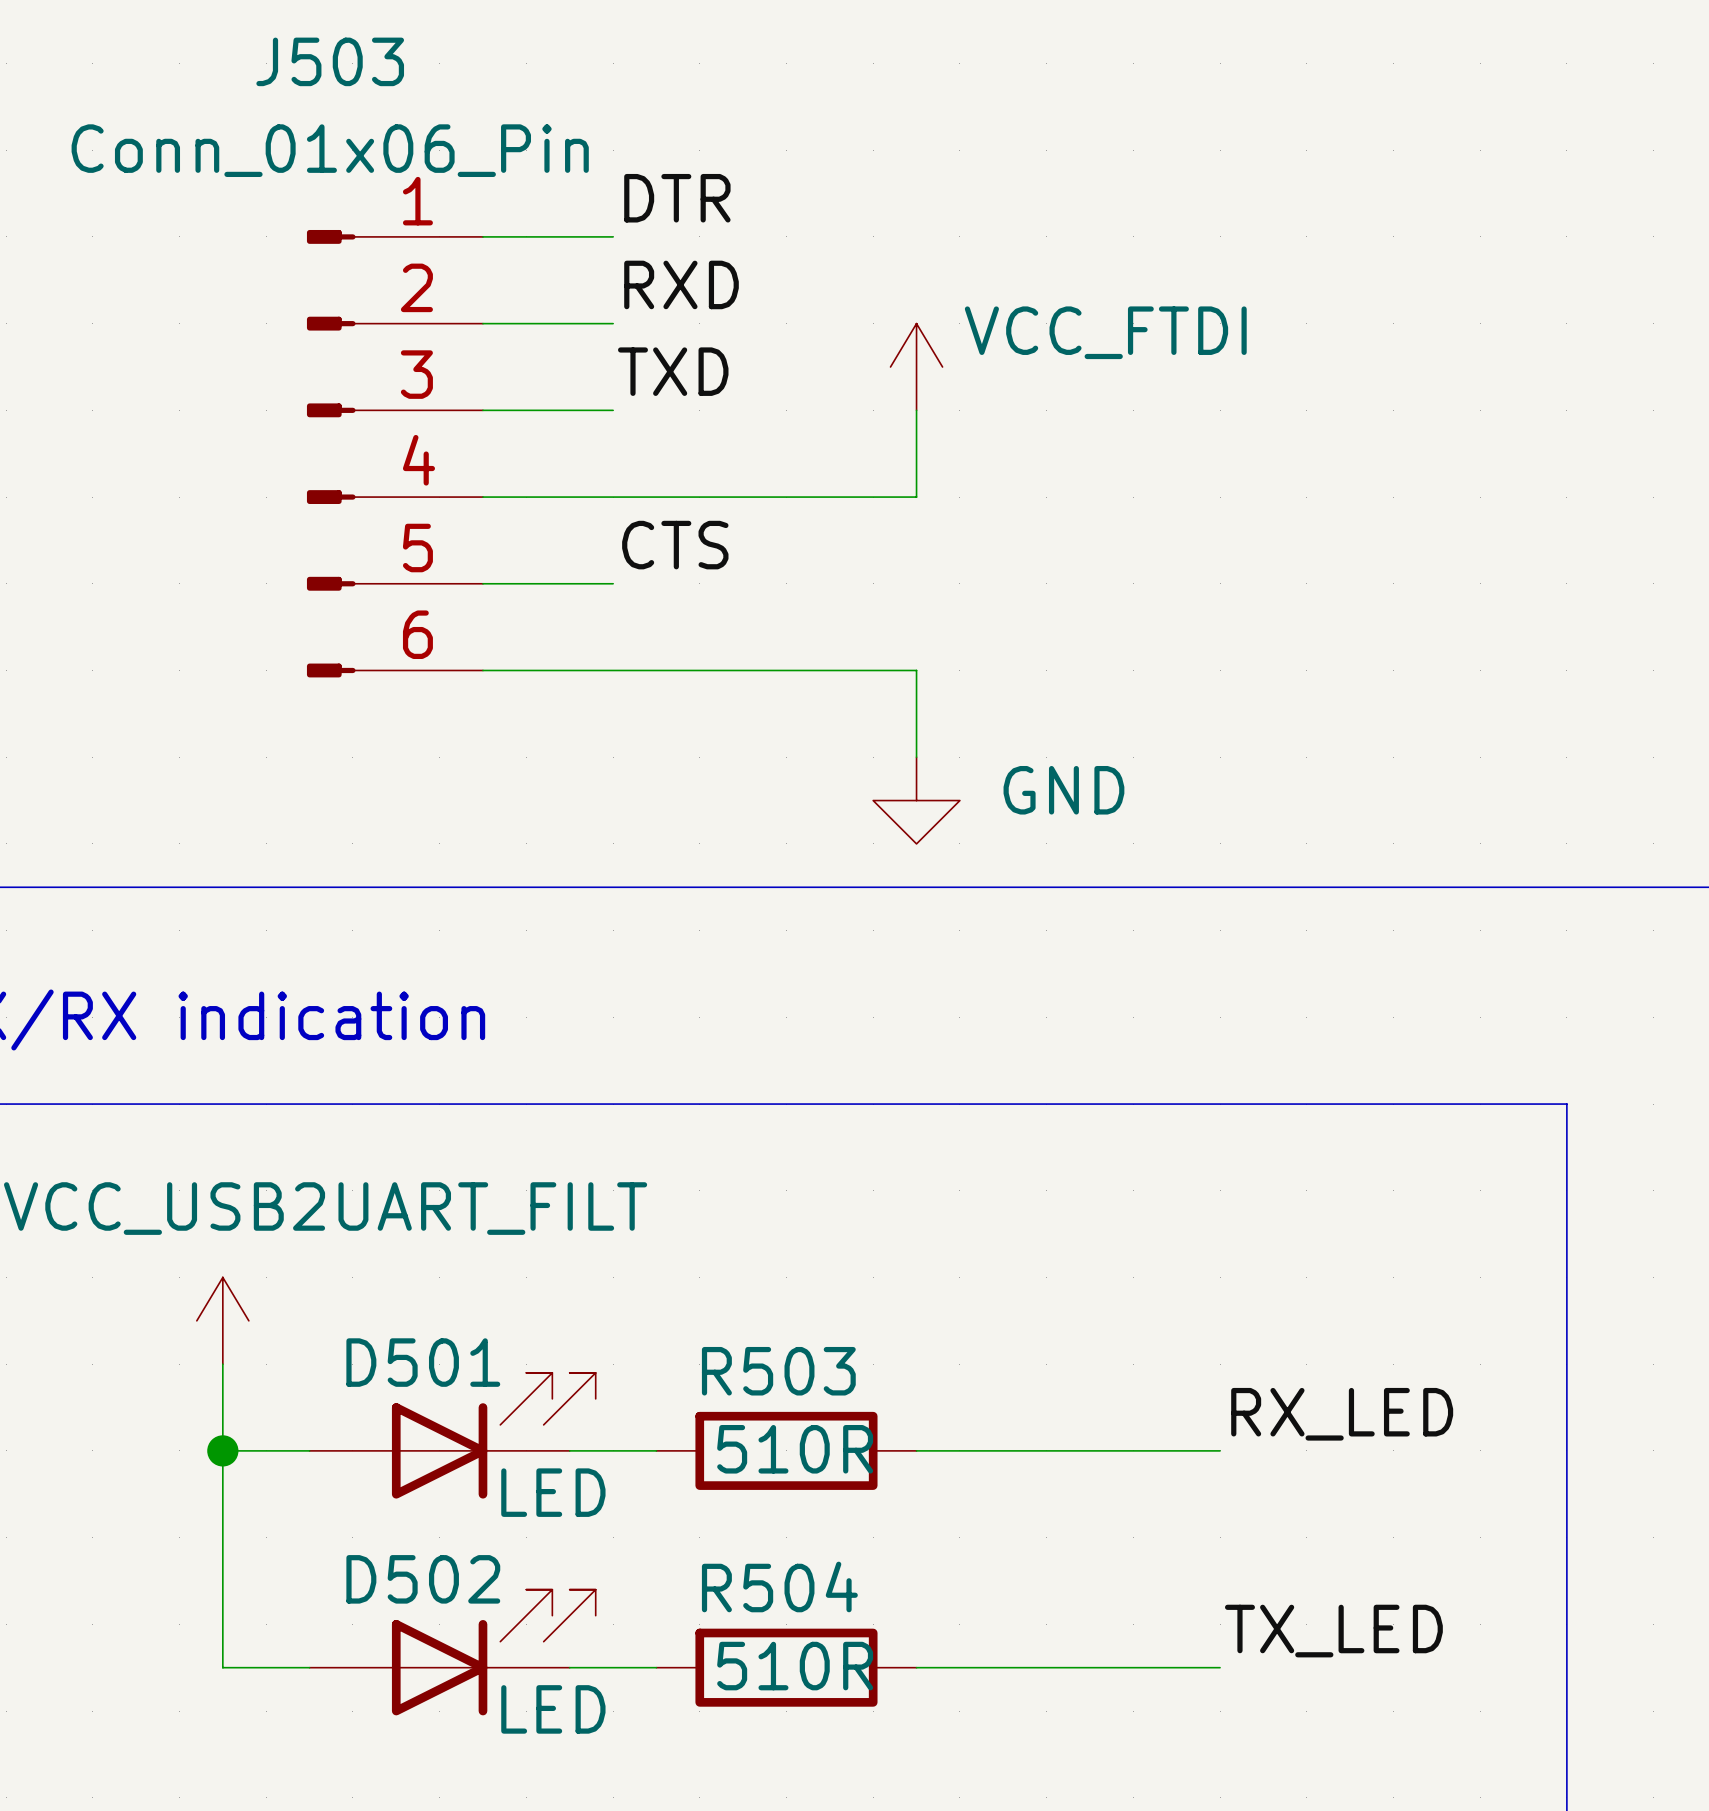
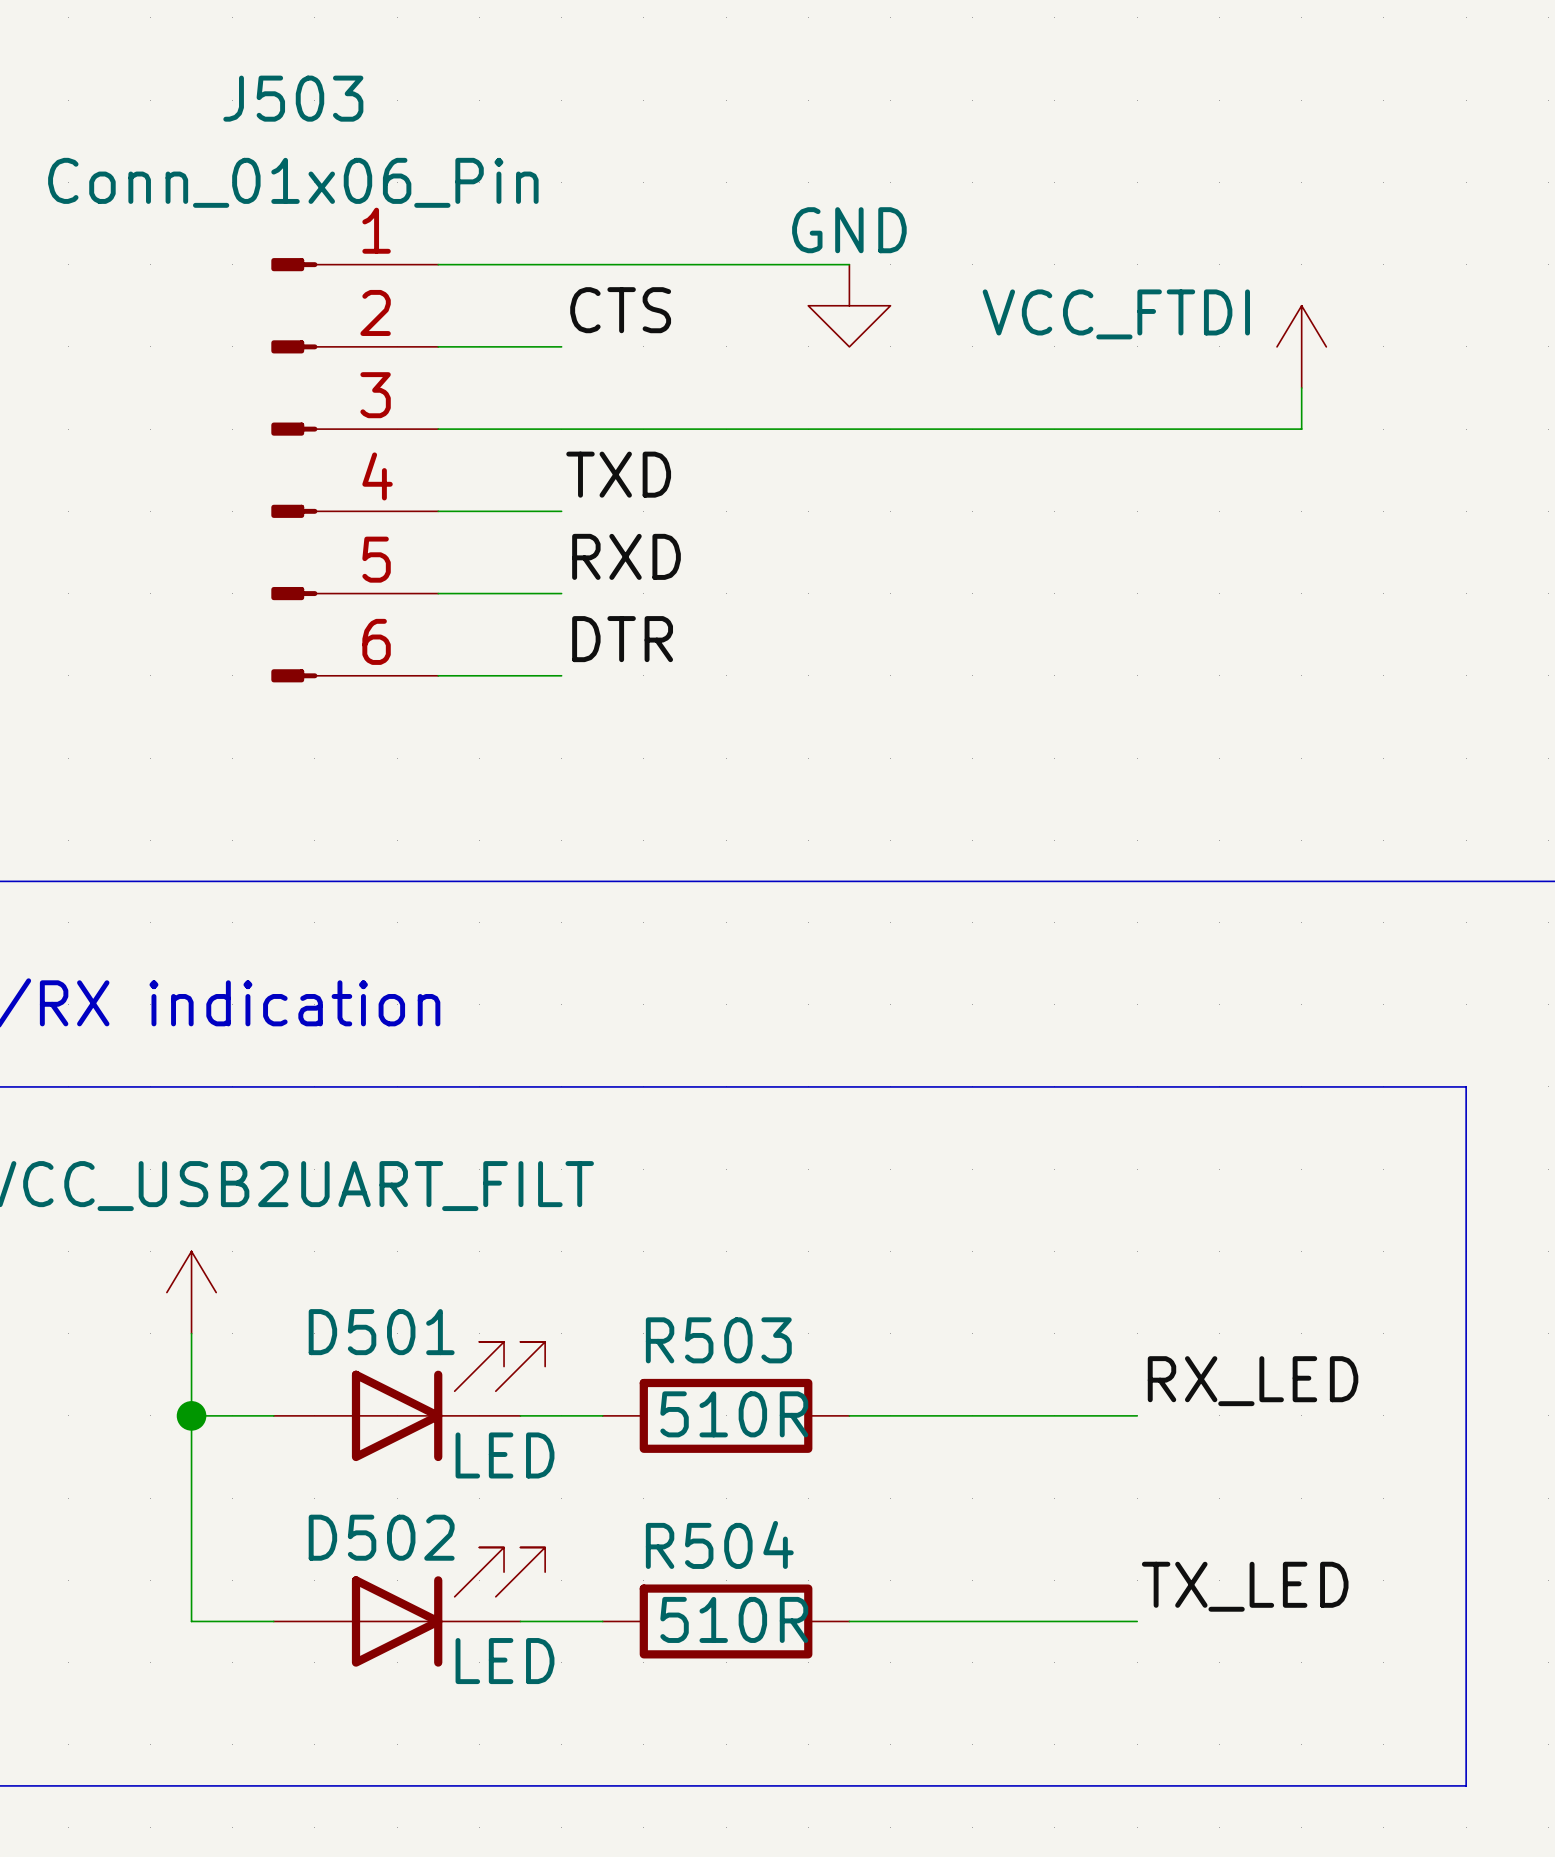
label position: DTR (677, 198) -> DTR (622, 639)
wire: none -> (561, 264) (849, 264)
power symbol: none -> GND (849, 305)
label: RXD (681, 284) -> CTS (620, 310)
power symbol text position: VCC_FTDI (1105, 332) -> VCC_FTDI (1116, 314)
power symbol position: VCC_FTDI (916, 366) -> VCC_FTDI (1301, 346)
wire: none -> (1301, 387) (1301, 429) (561, 429)
label position: TXD (673, 371) -> TXD (618, 474)
wire: (916, 410) (916, 497) (613, 497) -> none
label: CTS (675, 545) -> RXD (626, 556)
wire: (613, 670) (916, 670) (916, 757) -> none
power symbol: GND (916, 800) -> none

